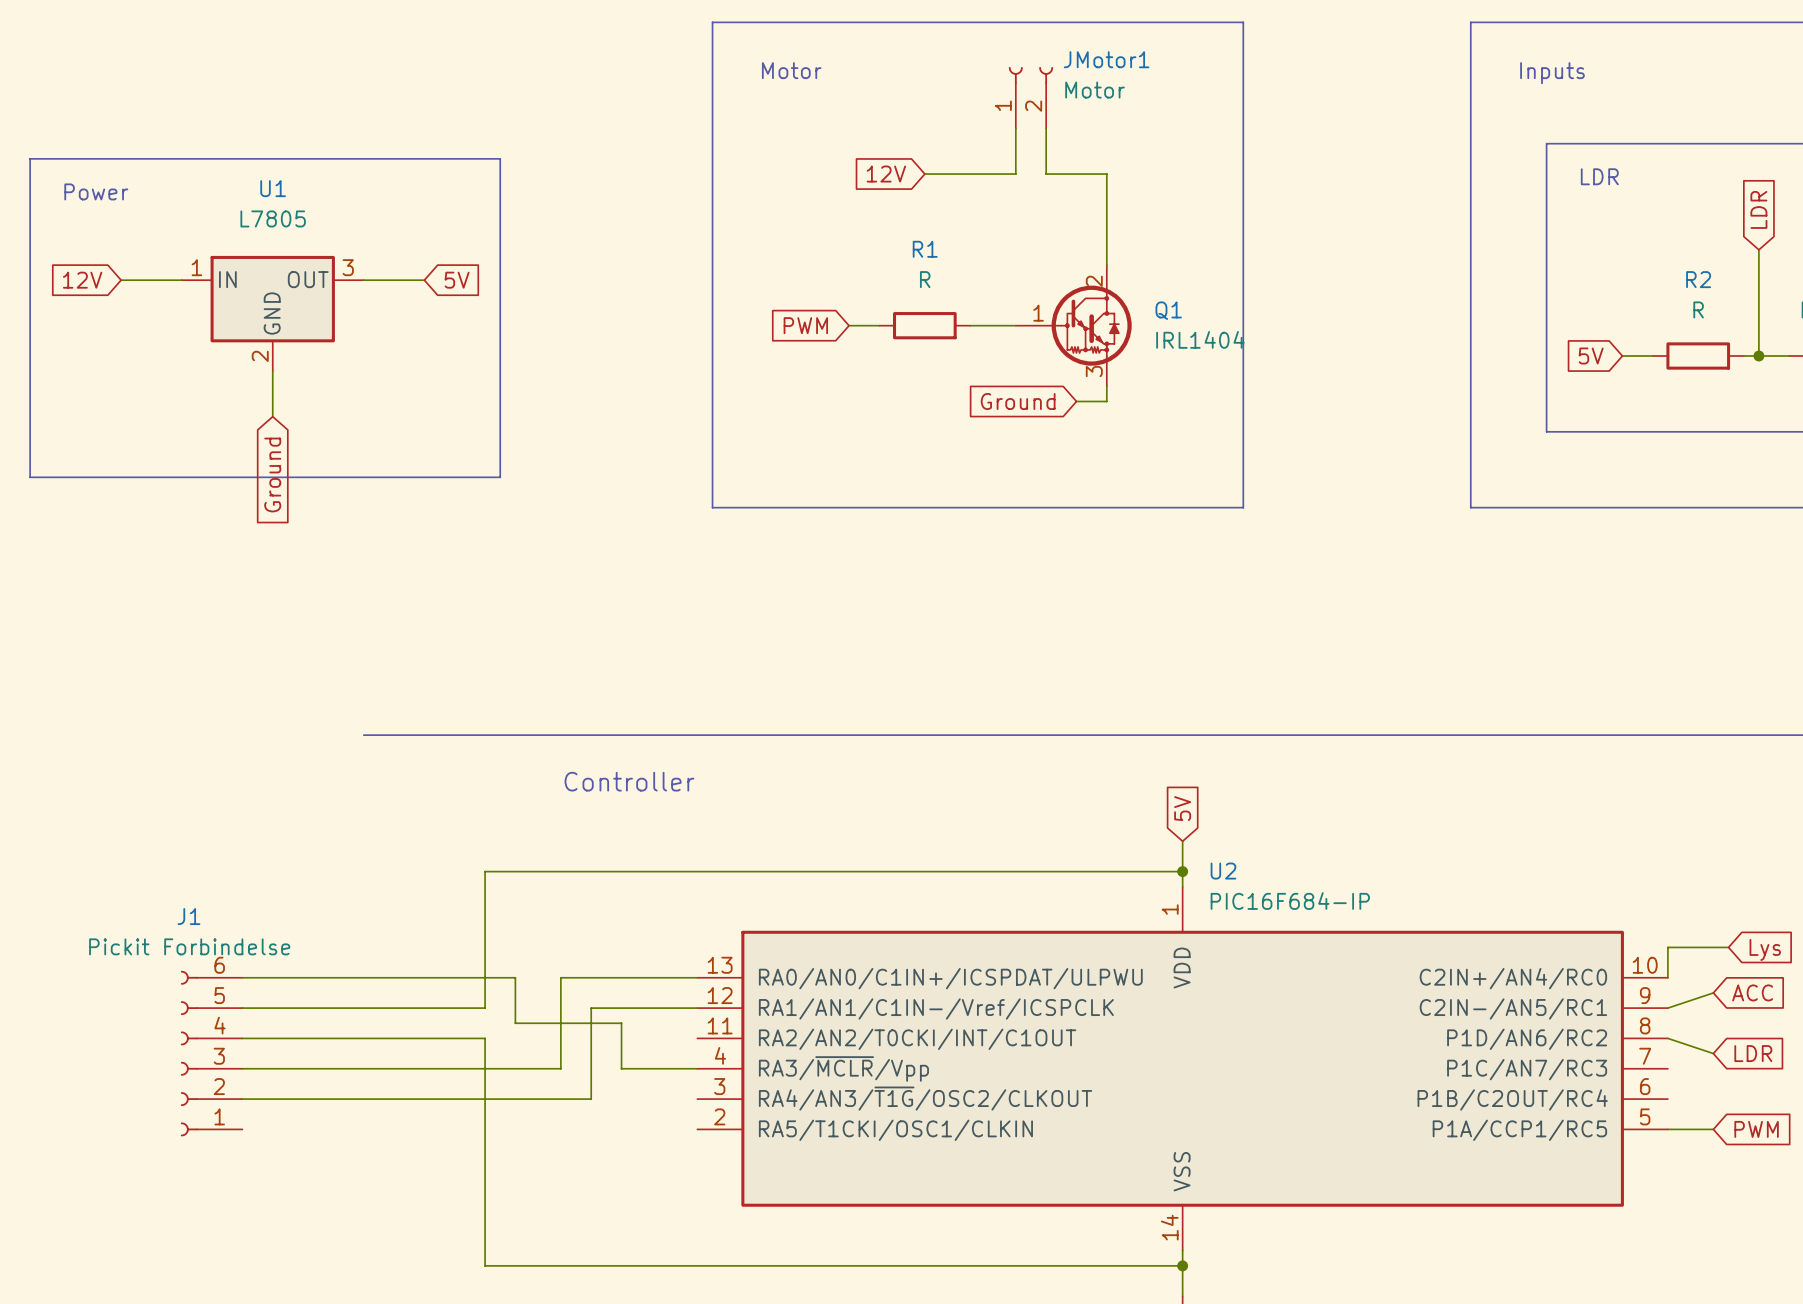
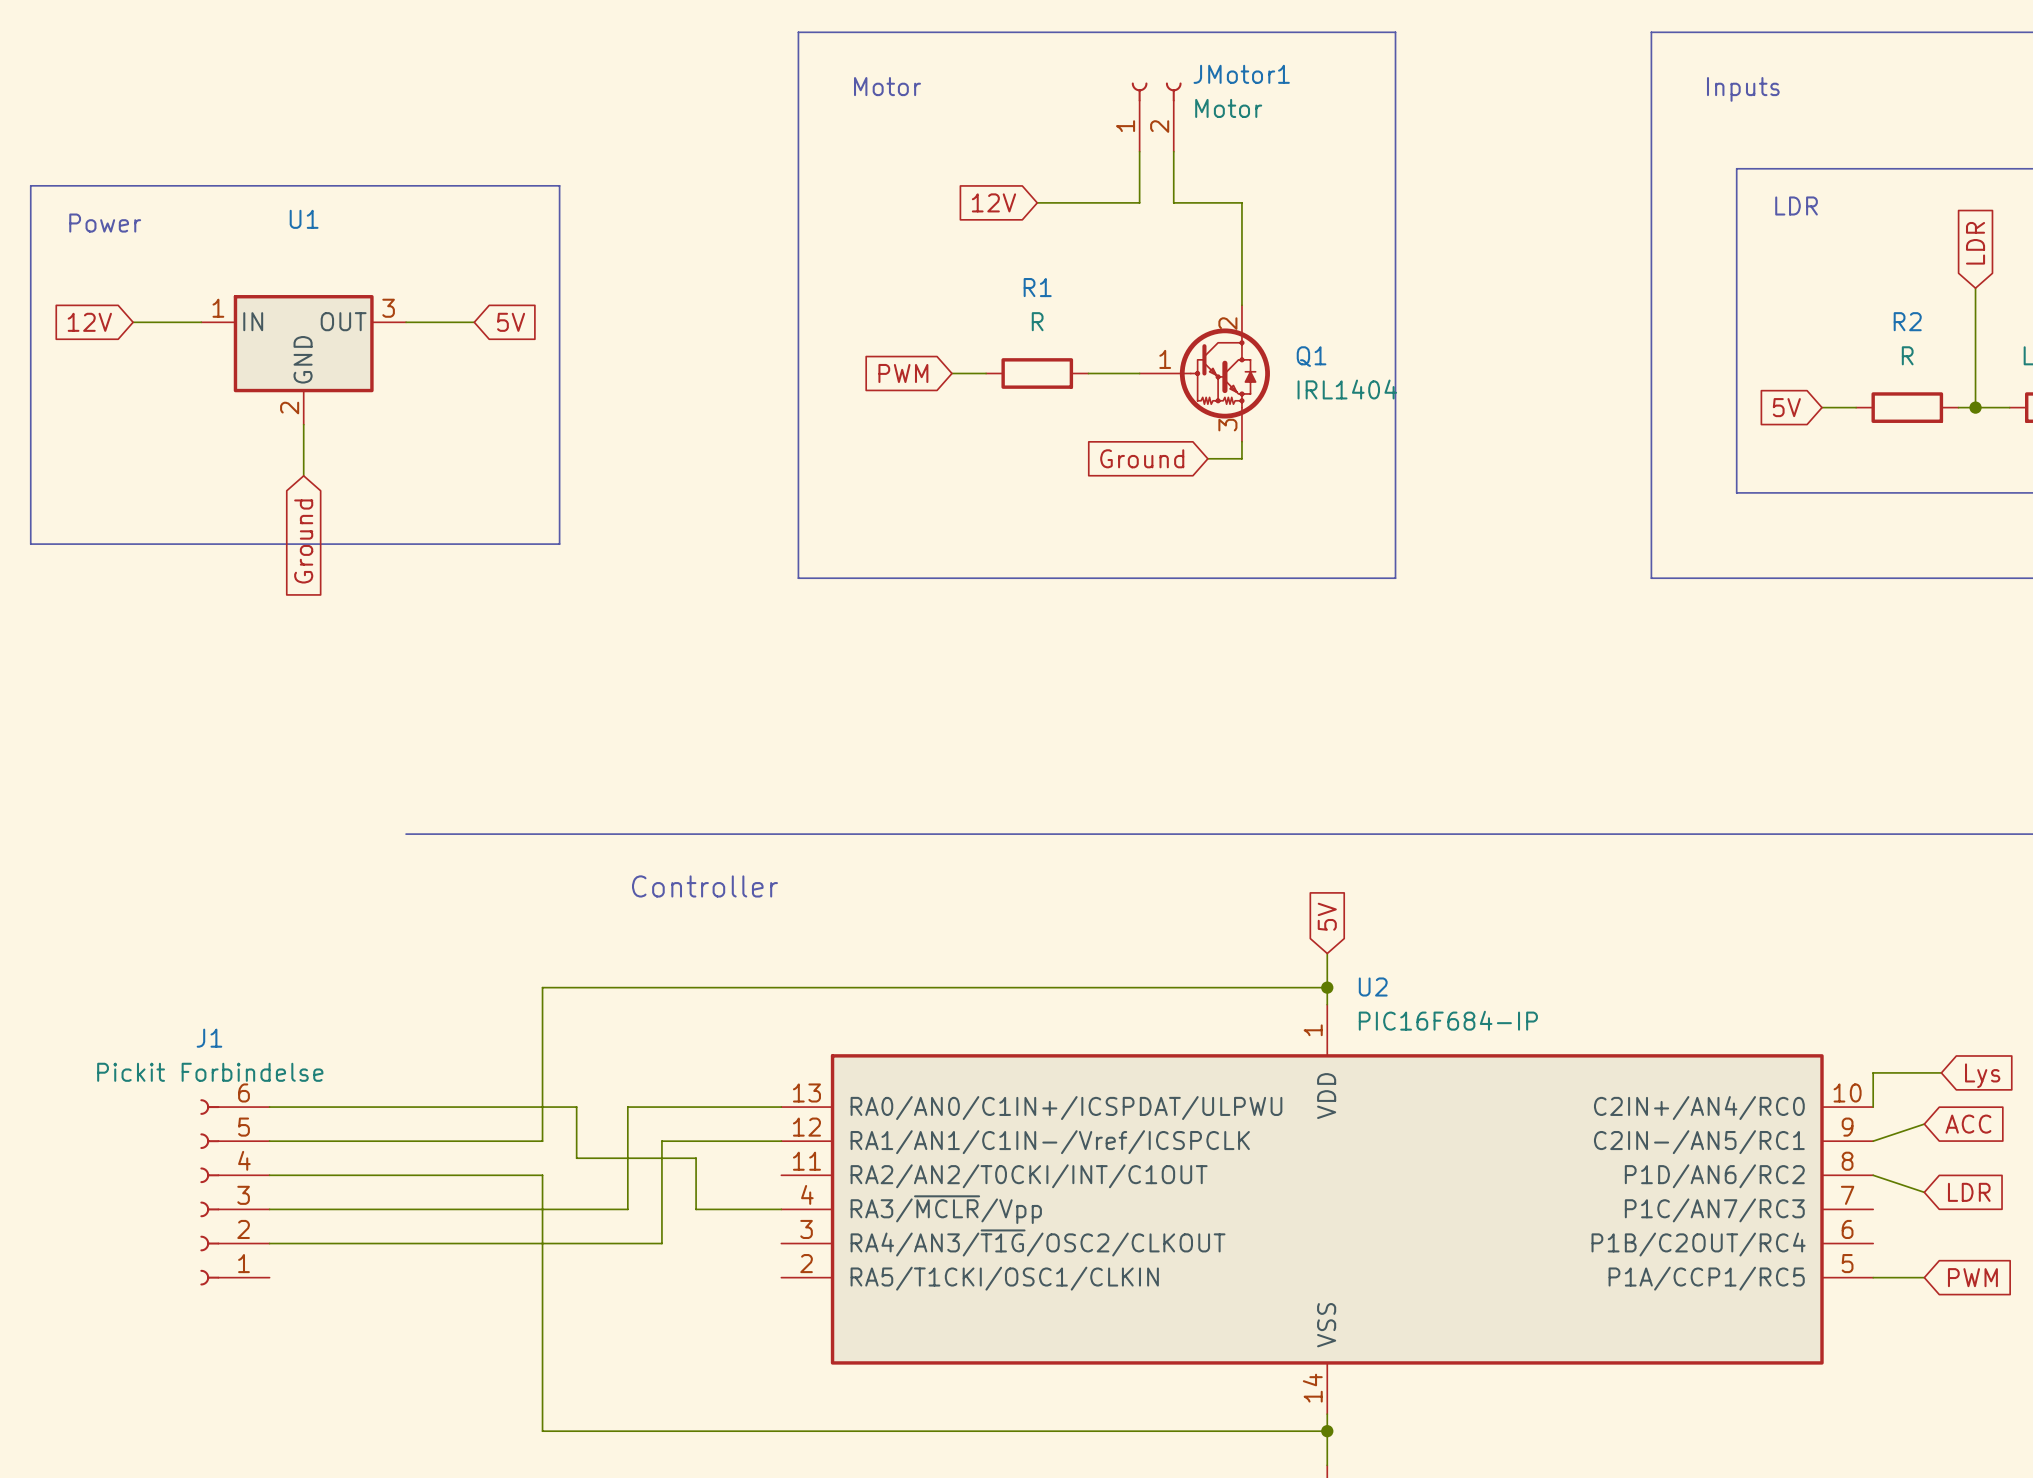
U1 value: L7805 (273, 218) -> none

